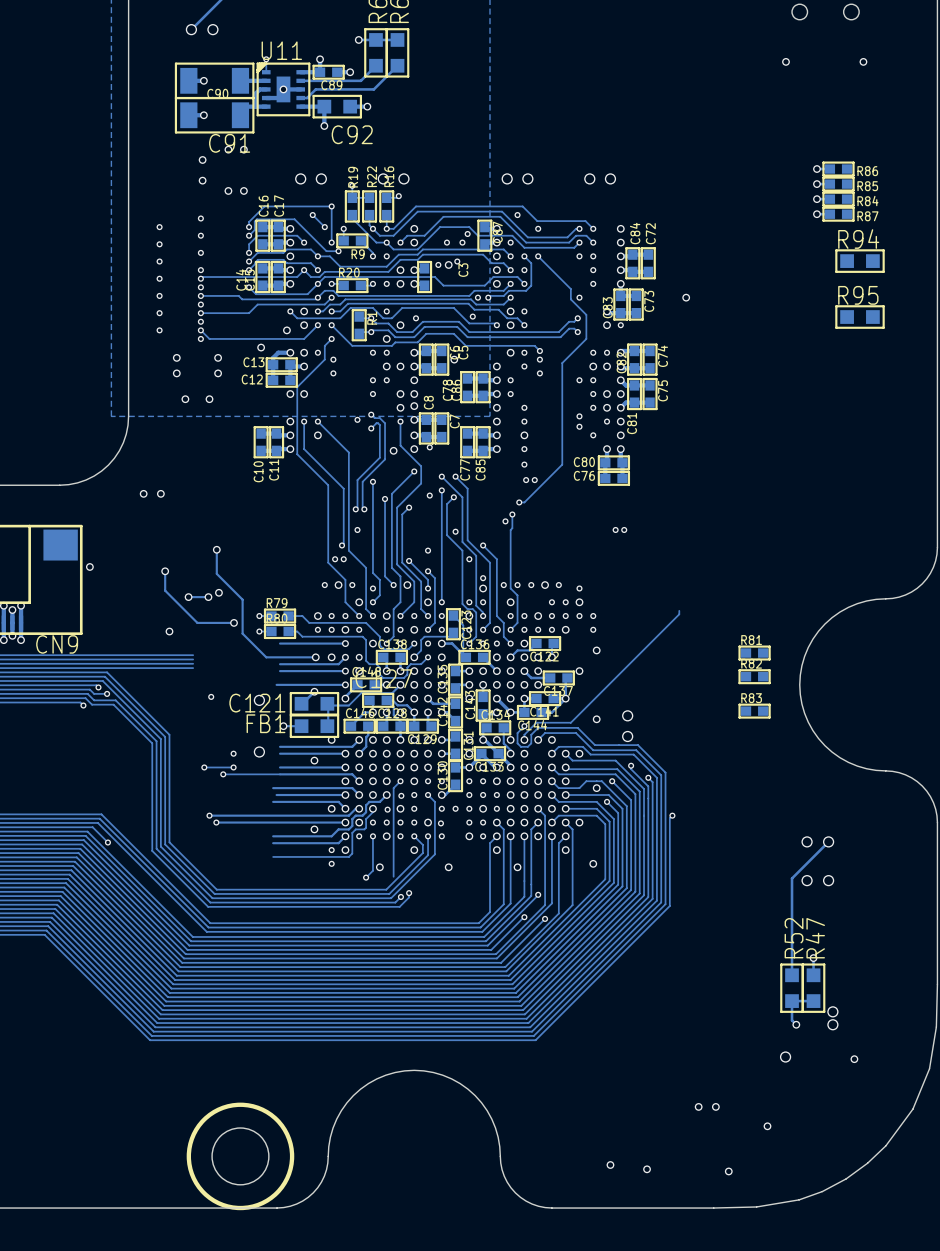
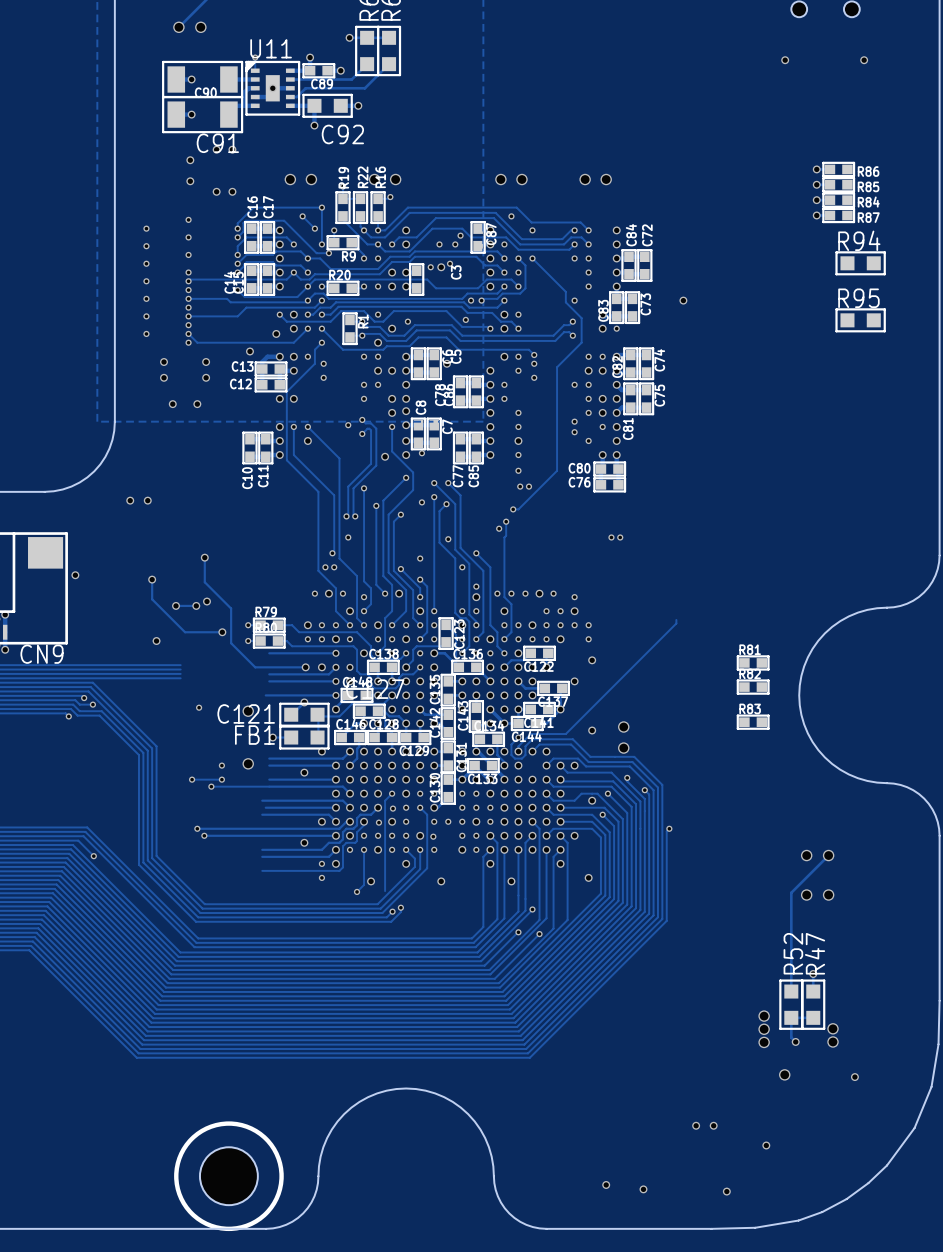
via: none -> (764, 1016)
via: none -> (764, 1029)
via: none -> (764, 1042)

